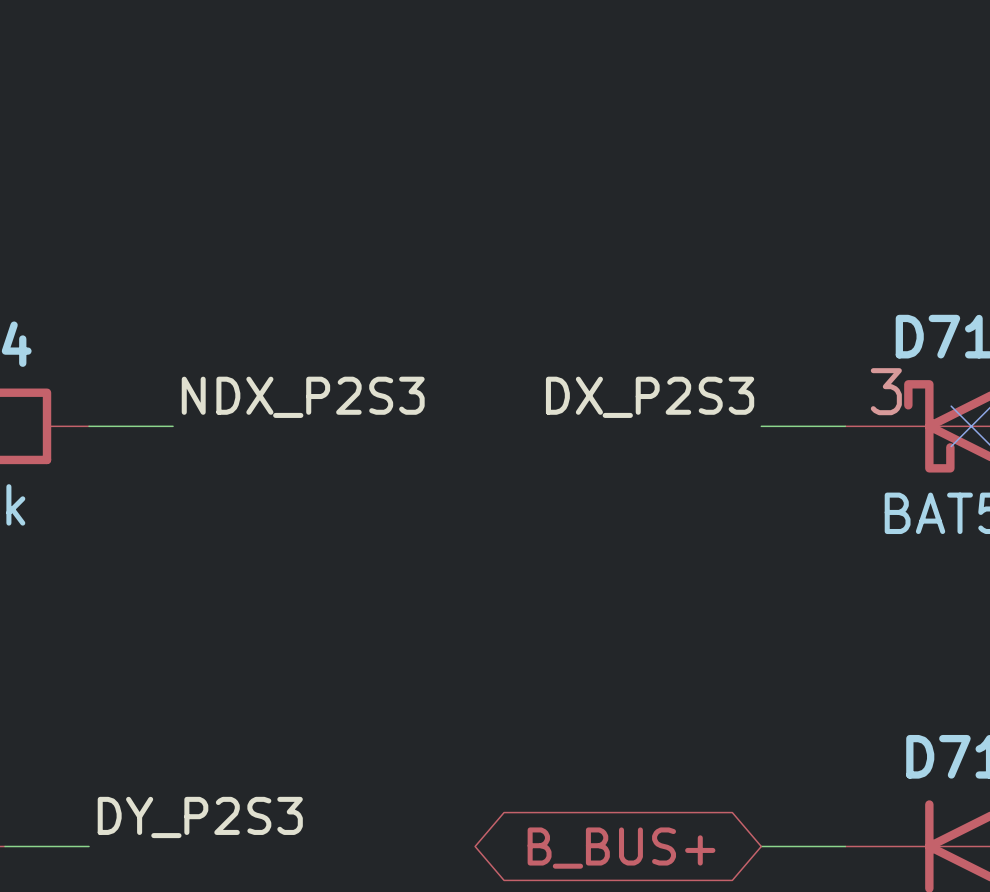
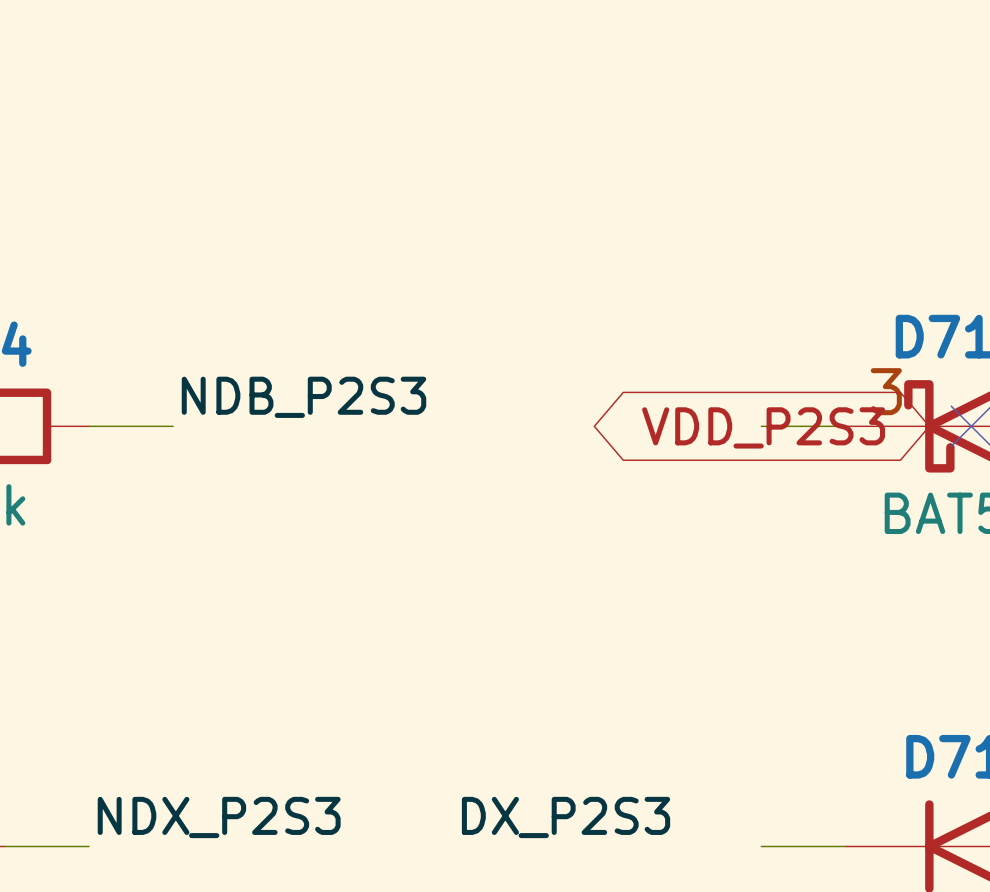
label: NDX_P2S3 (303, 397) -> NDB_P2S3 (303, 397)
label position: DX_P2S3 (650, 397) -> DX_P2S3 (566, 817)
global label: none -> VDD_P2S3 (763, 427)
label: DY_P2S3 (200, 817) -> NDX_P2S3 (219, 817)
global label: B_BUS+ (621, 848) -> none

